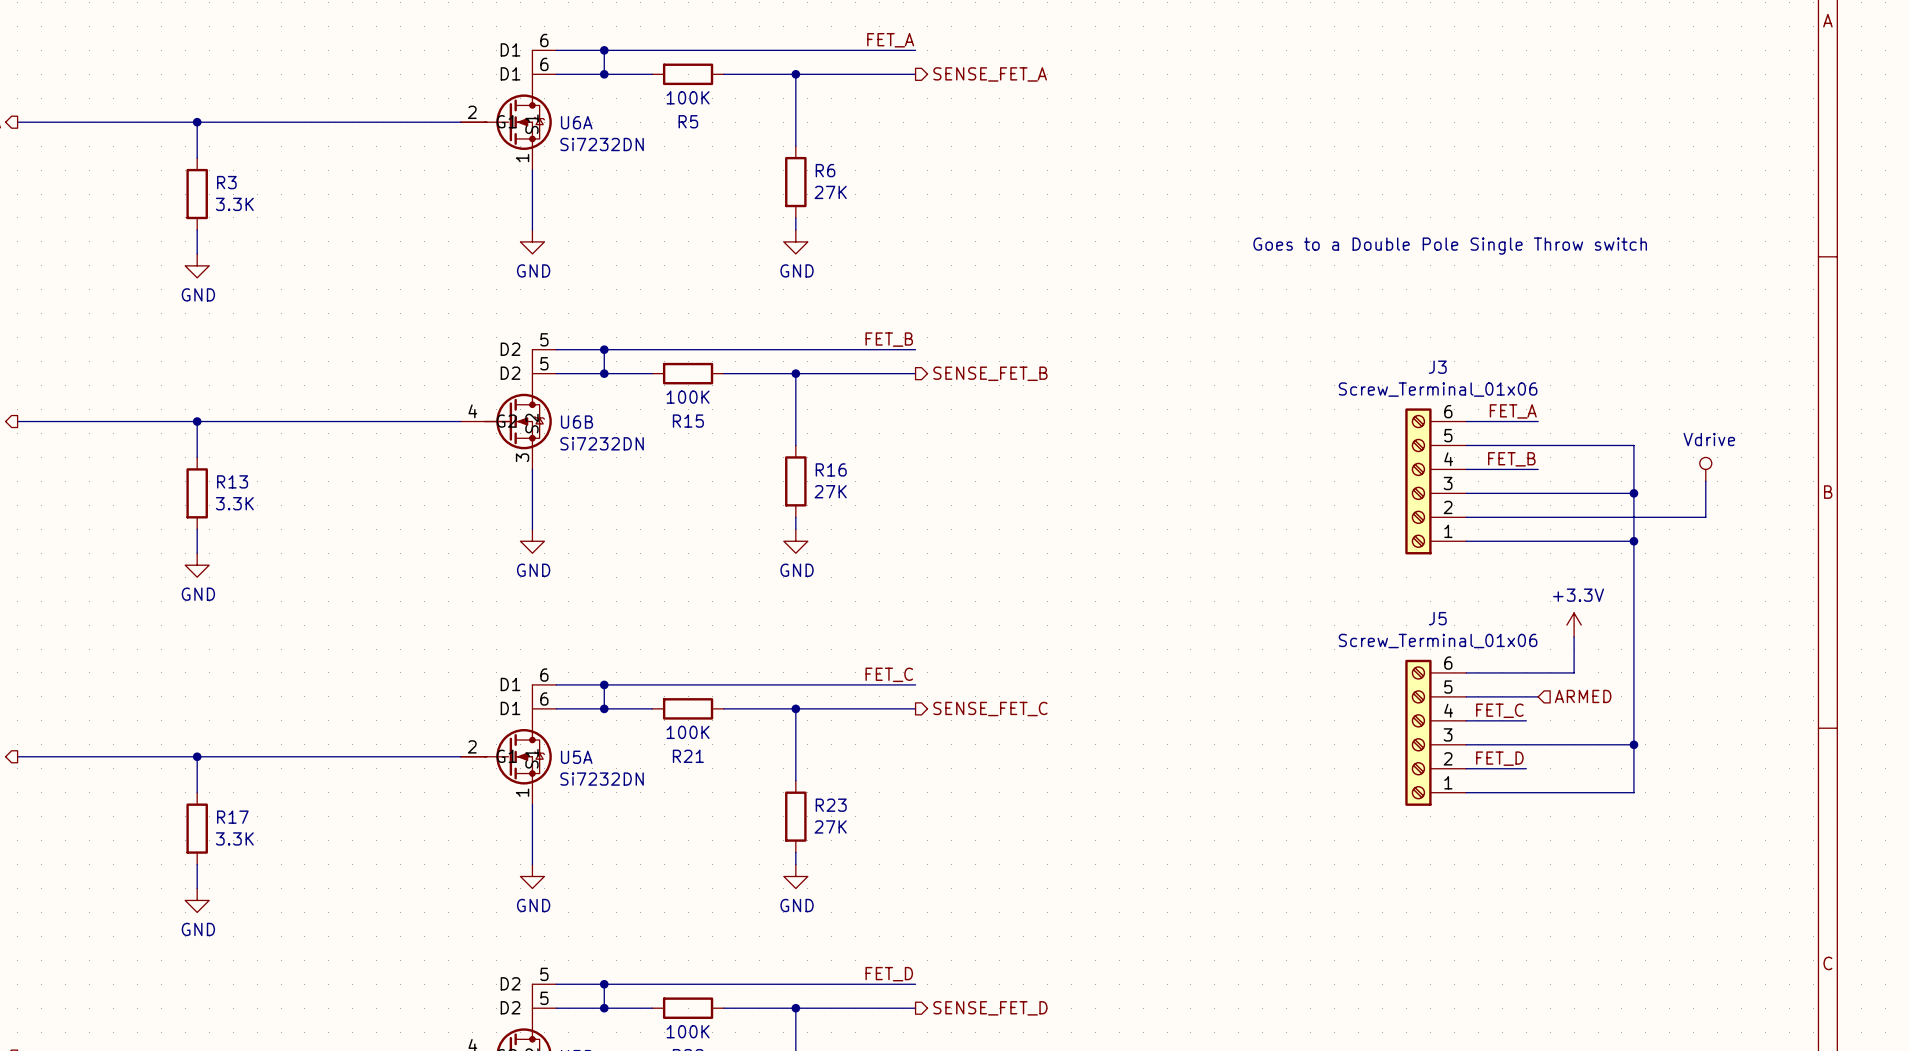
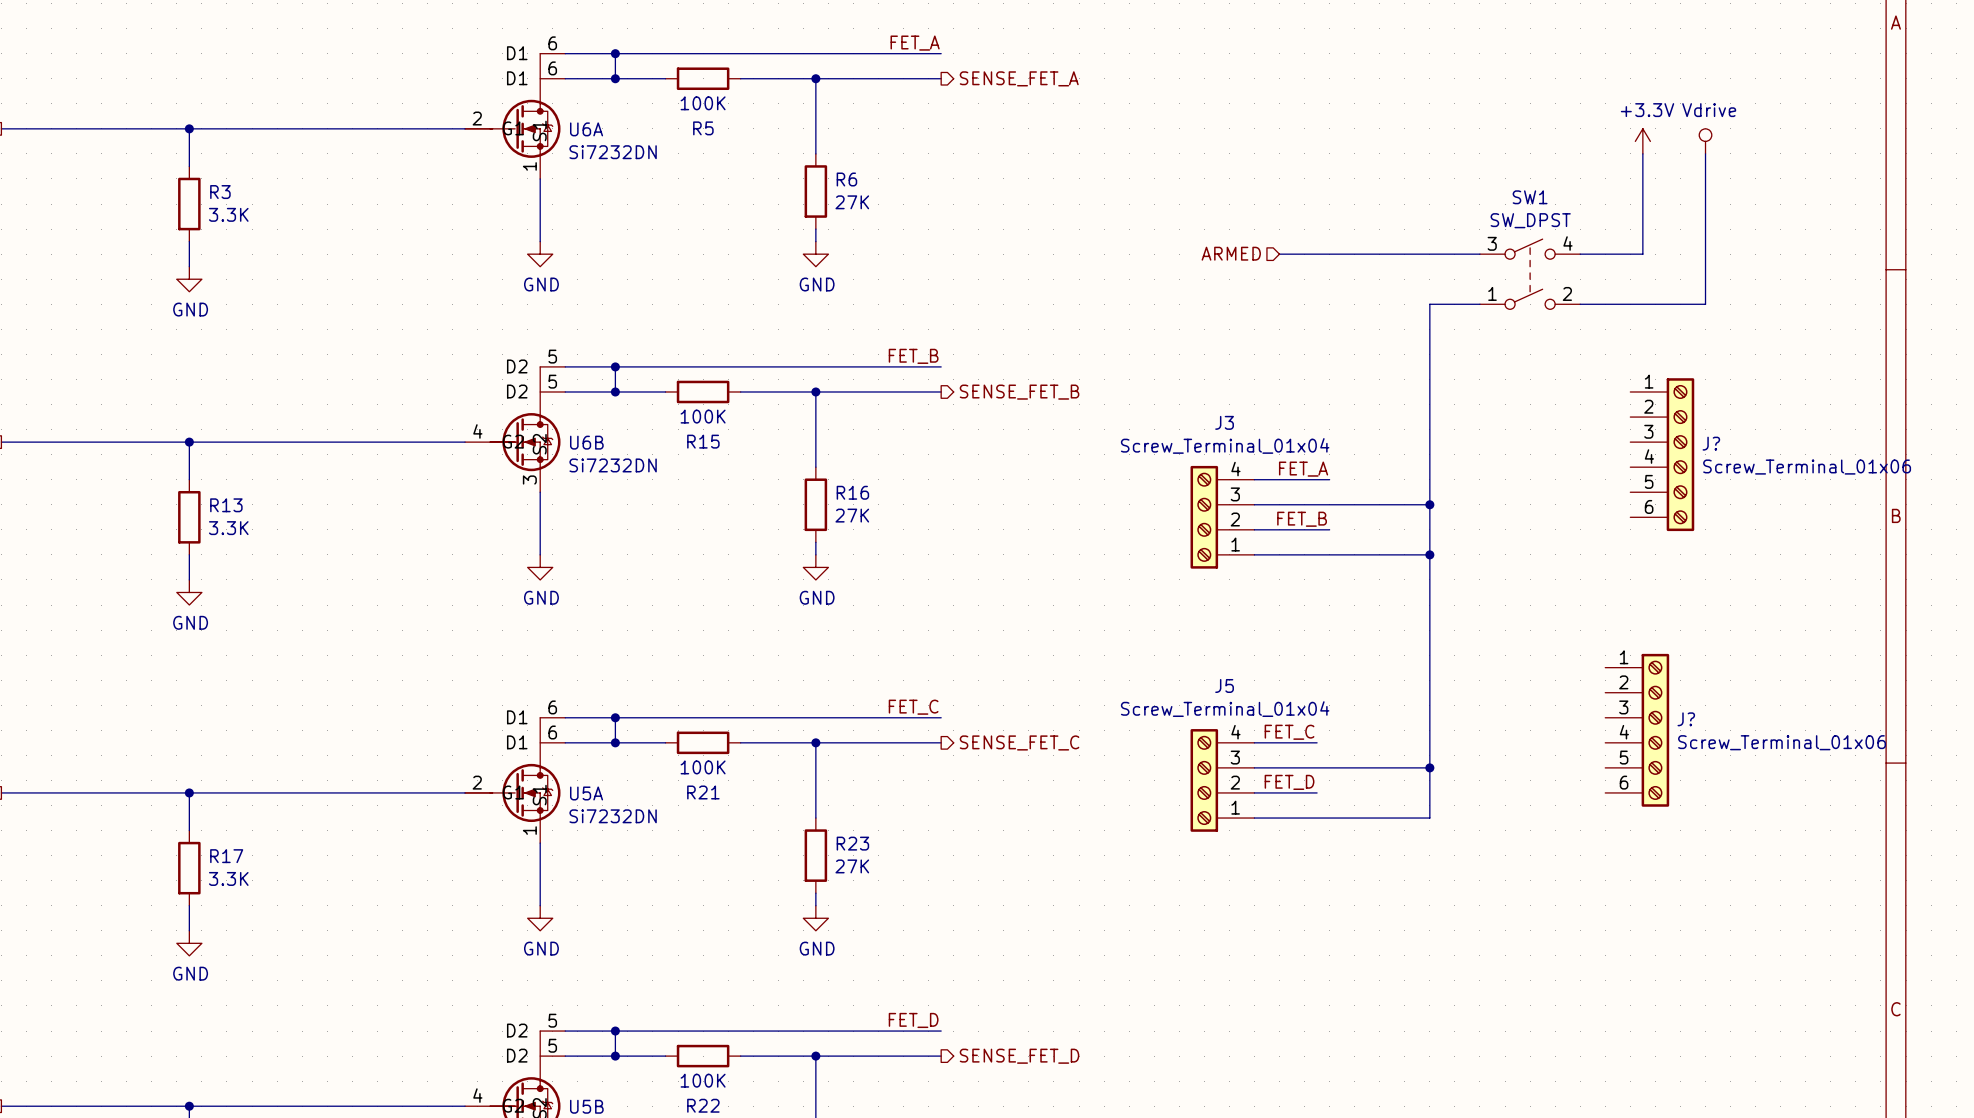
power symbol: none -> +3.3V (1642, 141)
power symbol: none -> Vdrive (1705, 141)
wire: none -> (1642, 153) (1642, 254) (1580, 254)
wire: none -> (1705, 153) (1705, 304) (1580, 304)
hierarchical label: none -> ARMED (1231, 253)
wire: none -> (1279, 254) (1479, 254)
text: Goes to a Double Pole Single Throw switch (1450, 246) -> none
SW1: none -> SW_DPST (1530, 274)
wire: none -> (1479, 304) (1429, 304) (1429, 818) (1254, 818)
J3 name position: J3 (1437, 367) -> J3 (1224, 422)
J3 value: Screw_Terminal_01x06 (1438, 389) -> Screw_Terminal_01x04 (1225, 445)
J3 symbol: [1405, 408, 1467, 555] -> [1190, 465, 1255, 569]
label: FET_A (1513, 411) -> none
wire: (1466, 421) (1538, 421) -> none
J?: none -> Screw_Terminal_01x06 (1662, 454)
wire: (1466, 445) (1633, 445) (1633, 792) (1466, 792) -> none
label: none -> FET_A (1303, 469)
wire: none -> (1254, 479) (1329, 479)
label: FET_B (1511, 459) -> none
wire: (1466, 469) (1538, 469) -> none
power symbol: Vdrive (1705, 469) -> none
wire: none -> (1254, 504) (1429, 504)
junction: none -> (1429, 504)
wire: (1705, 481) (1705, 517) (1466, 517) -> none
wire: (1466, 493) (1633, 493) -> none
junction: (1633, 493) -> none
label: none -> FET_B (1302, 519)
wire: none -> (1254, 529) (1329, 529)
wire: none -> (1254, 554) (1429, 554)
junction: none -> (1429, 554)
wire: (1466, 541) (1633, 541) -> none
junction: (1633, 541) -> none
J5 name position: J5 (1437, 618) -> J5 (1224, 685)
power symbol: +3.3V (1574, 625) -> none
wire: (1574, 637) (1574, 672) (1466, 672) -> none
J5 value: Screw_Terminal_01x06 (1438, 641) -> Screw_Terminal_01x04 (1225, 709)
J5 symbol: [1405, 659, 1467, 806] -> [1190, 729, 1255, 832]
wire: (1466, 696) (1538, 696) -> none
J?: none -> Screw_Terminal_01x06 (1637, 730)
hierarchical label: ARMED (1583, 696) -> none
label: none -> FET_C (1289, 732)
wire: none -> (1254, 742) (1317, 742)
label: FET_C (1499, 710) -> none
wire: (1466, 720) (1526, 720) -> none
wire: none -> (1254, 767) (1429, 767)
junction: none -> (1429, 767)
wire: (1466, 744) (1633, 744) -> none
junction: (1633, 744) -> none
label: none -> FET_D (1289, 782)
wire: none -> (1254, 792) (1317, 792)
label: FET_D (1499, 758) -> none
wire: (1466, 768) (1526, 768) -> none

